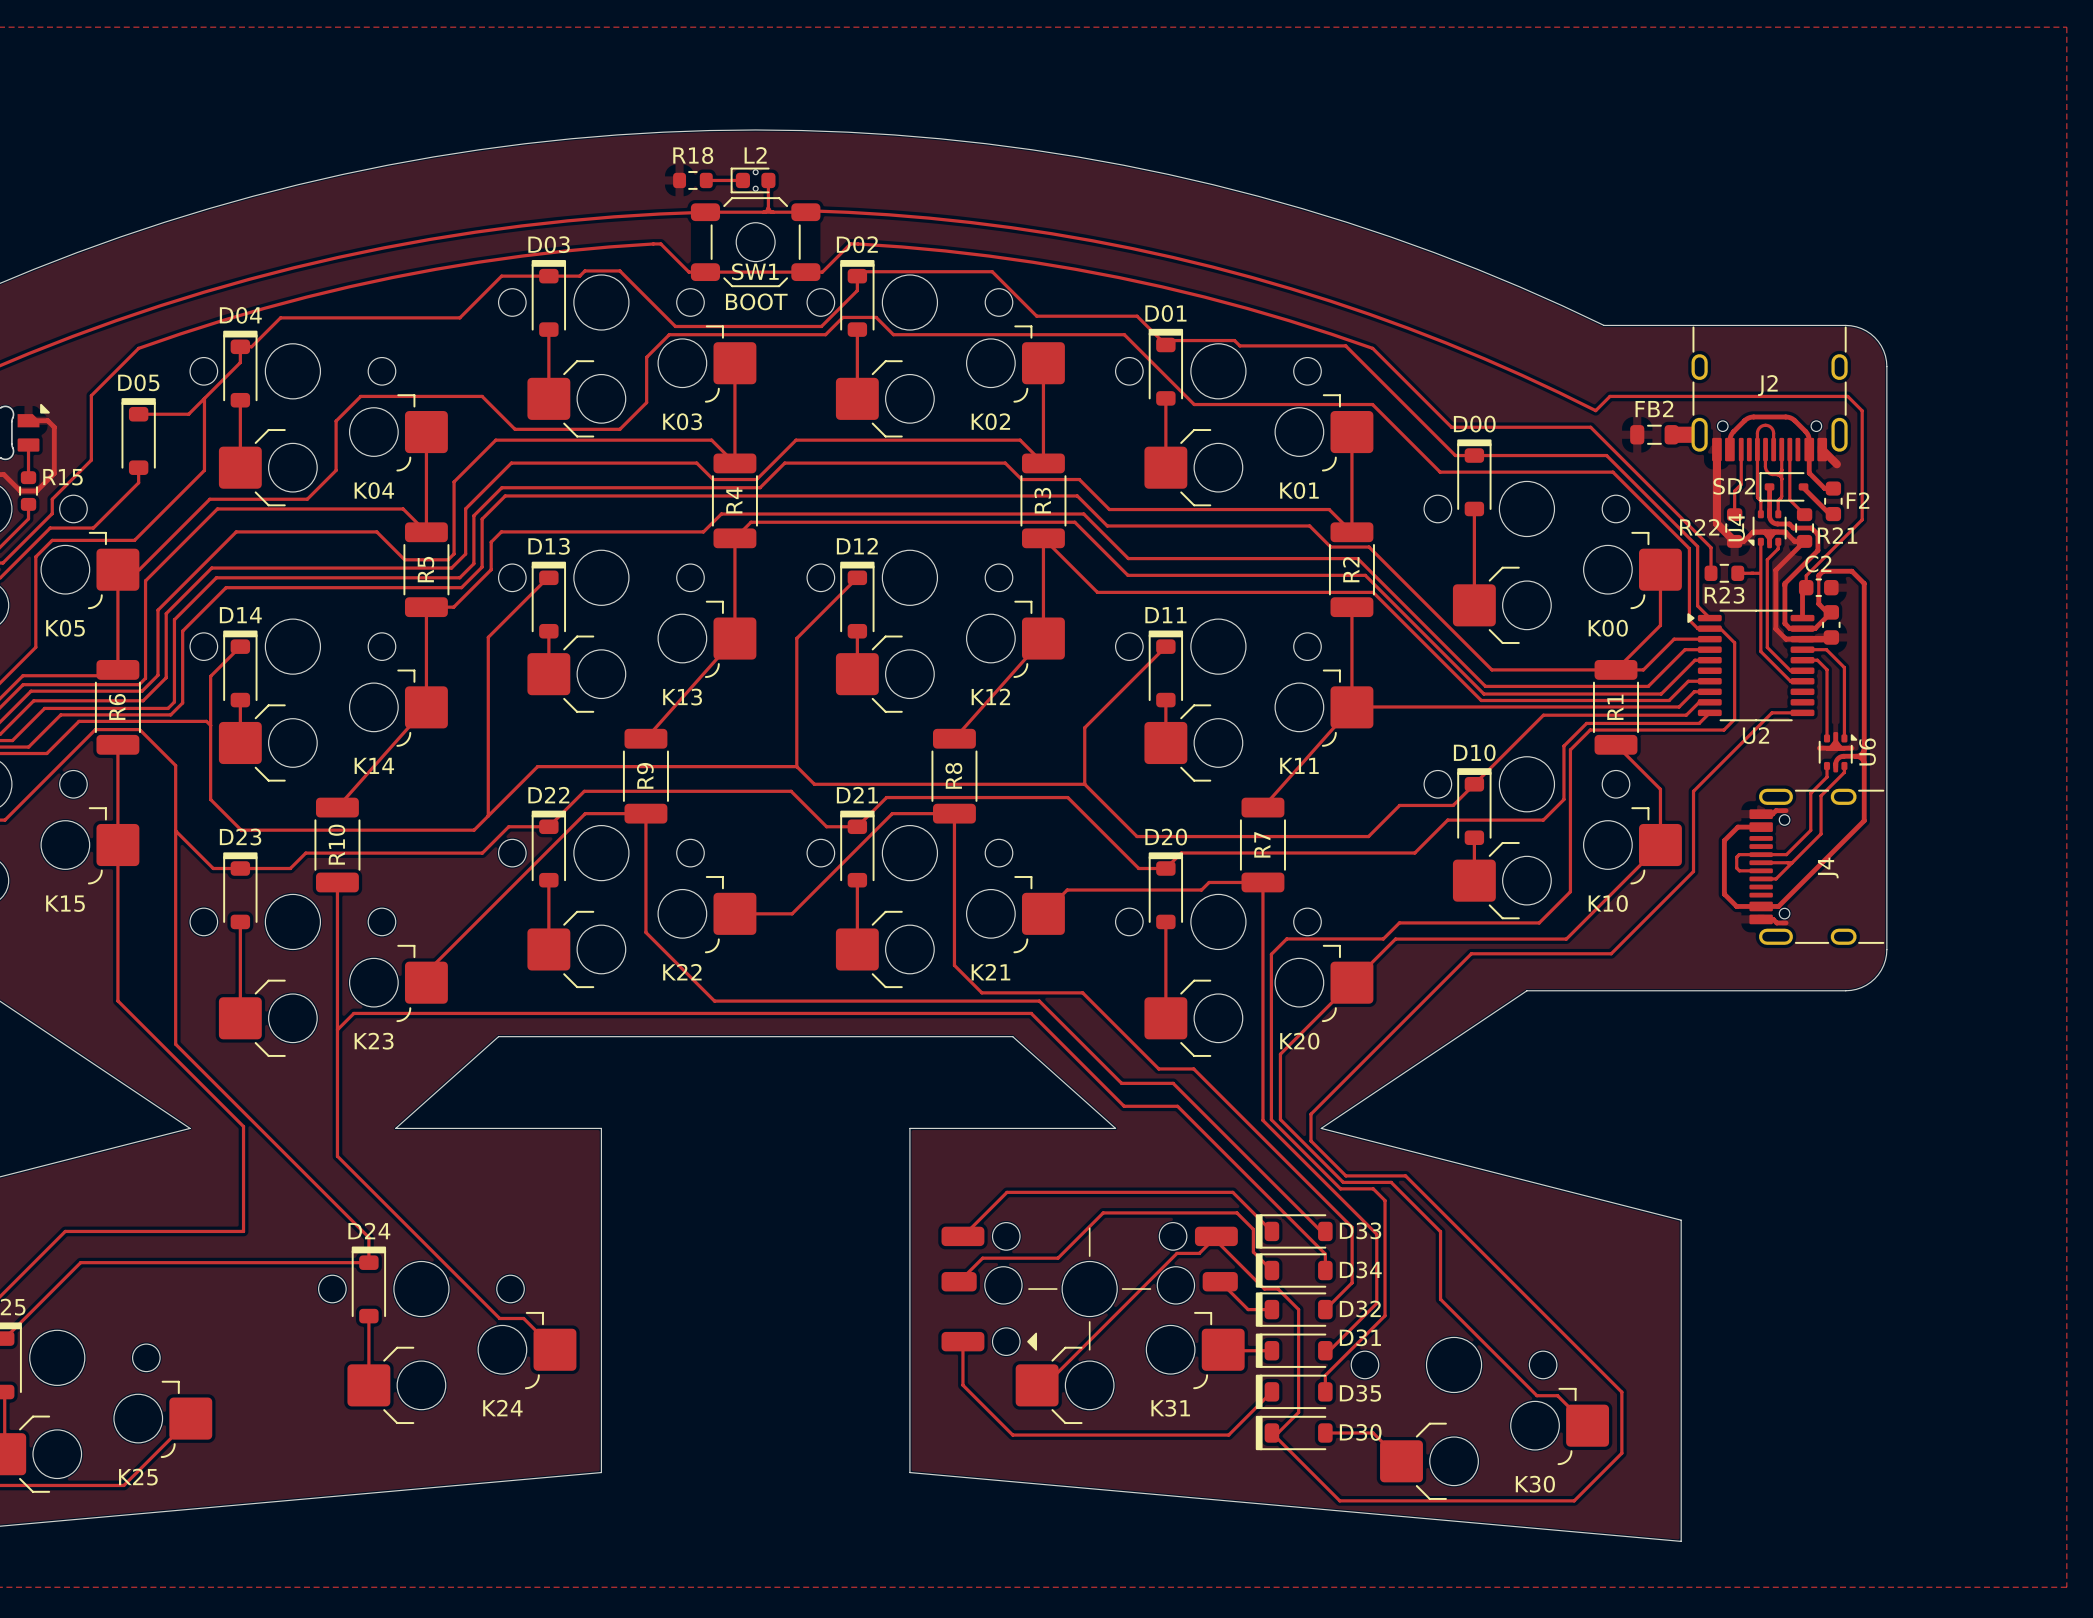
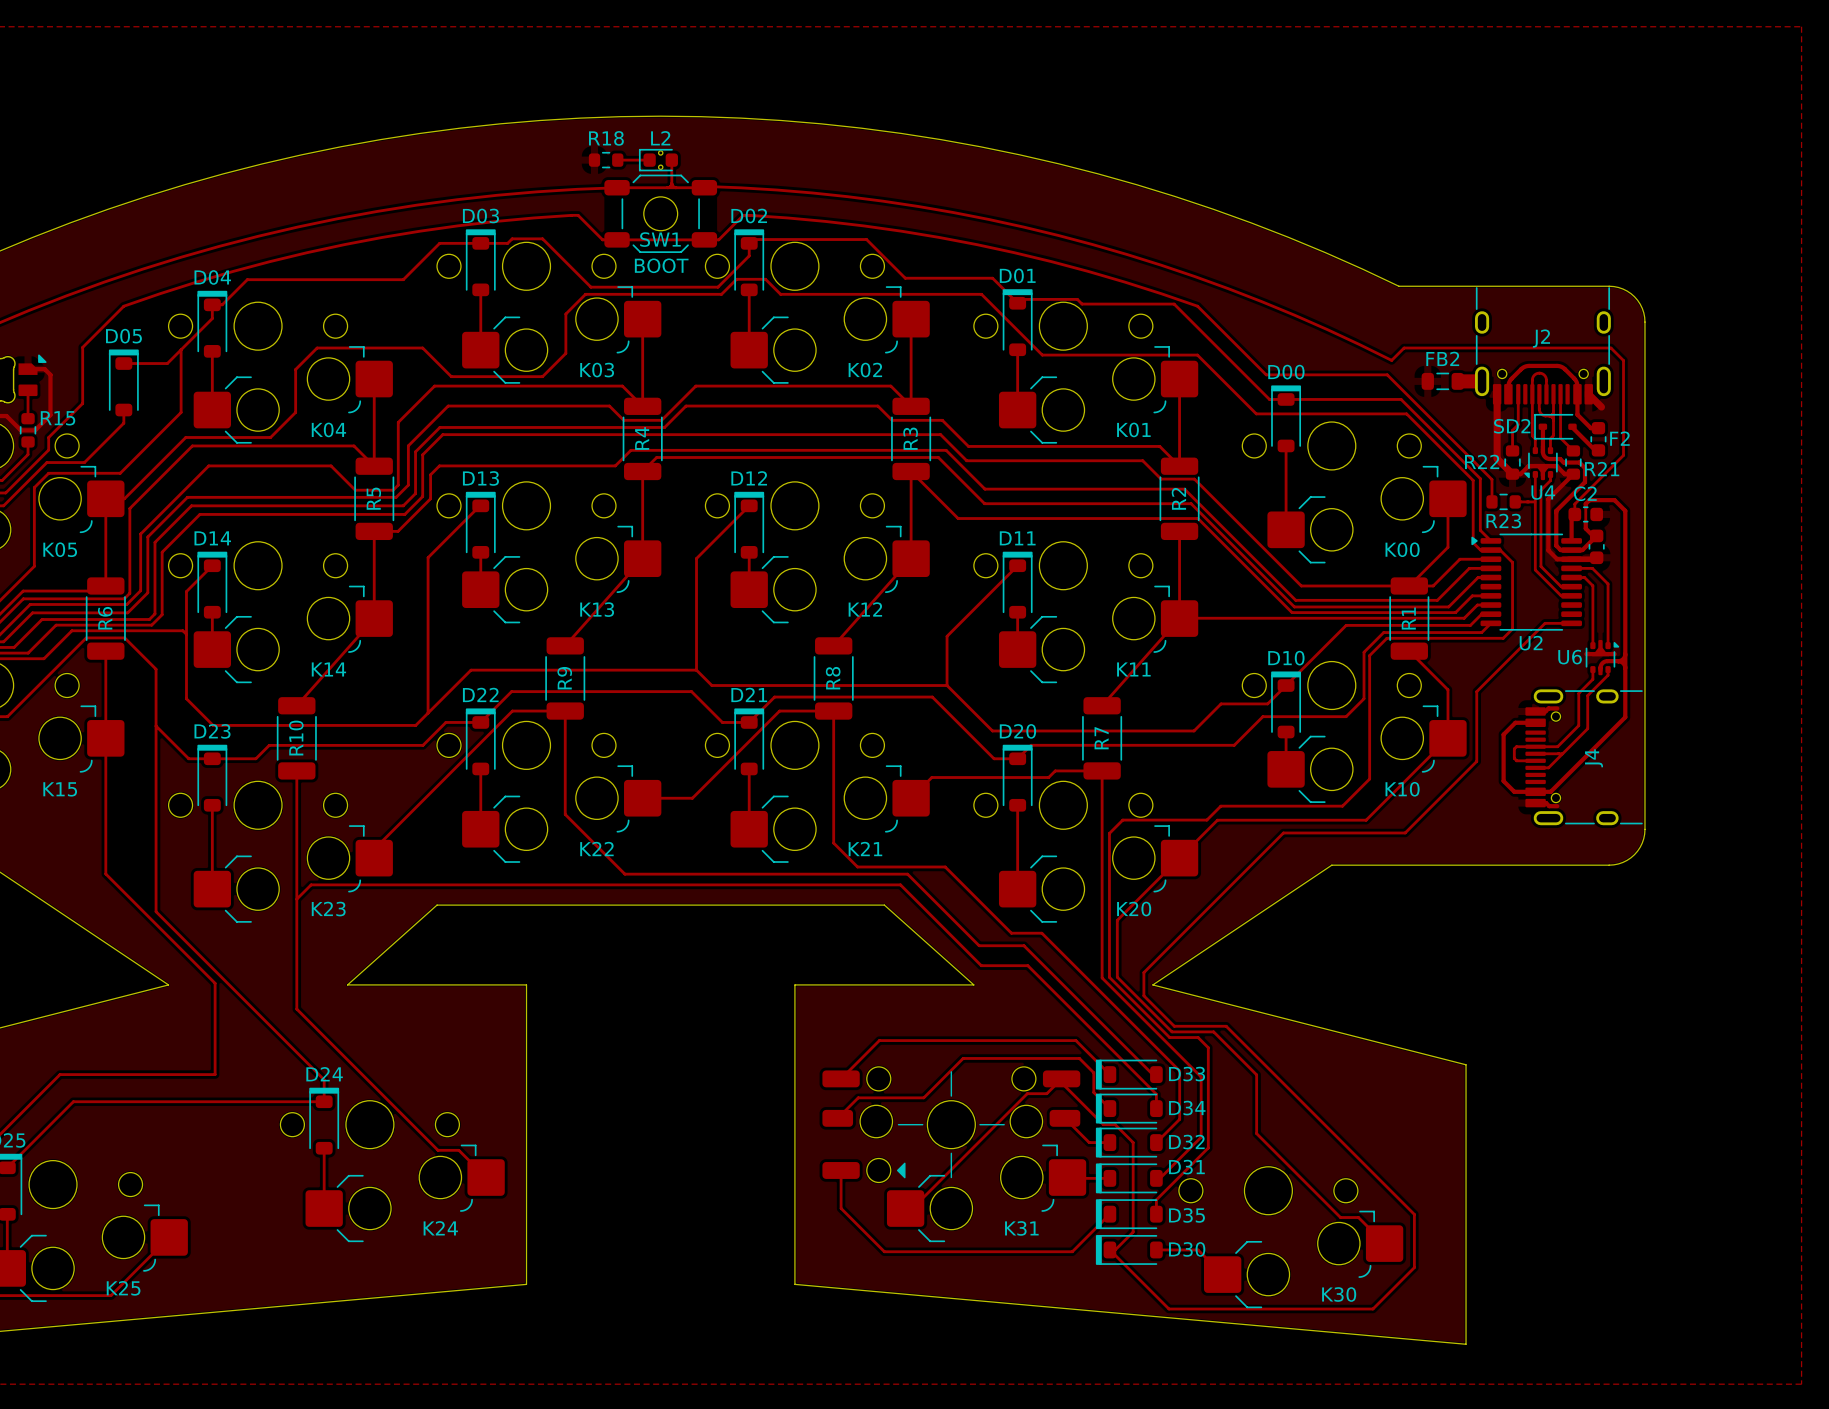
U4 name rotation: 0° (1736, 527) -> 90° clockwise (1543, 492)
U4 name position: U4 (1736, 527) -> U4 (1543, 492)
U6 name rotation: 0° (1867, 751) -> 90° clockwise (1570, 657)
U6 name position: U6 (1867, 751) -> U6 (1570, 657)

